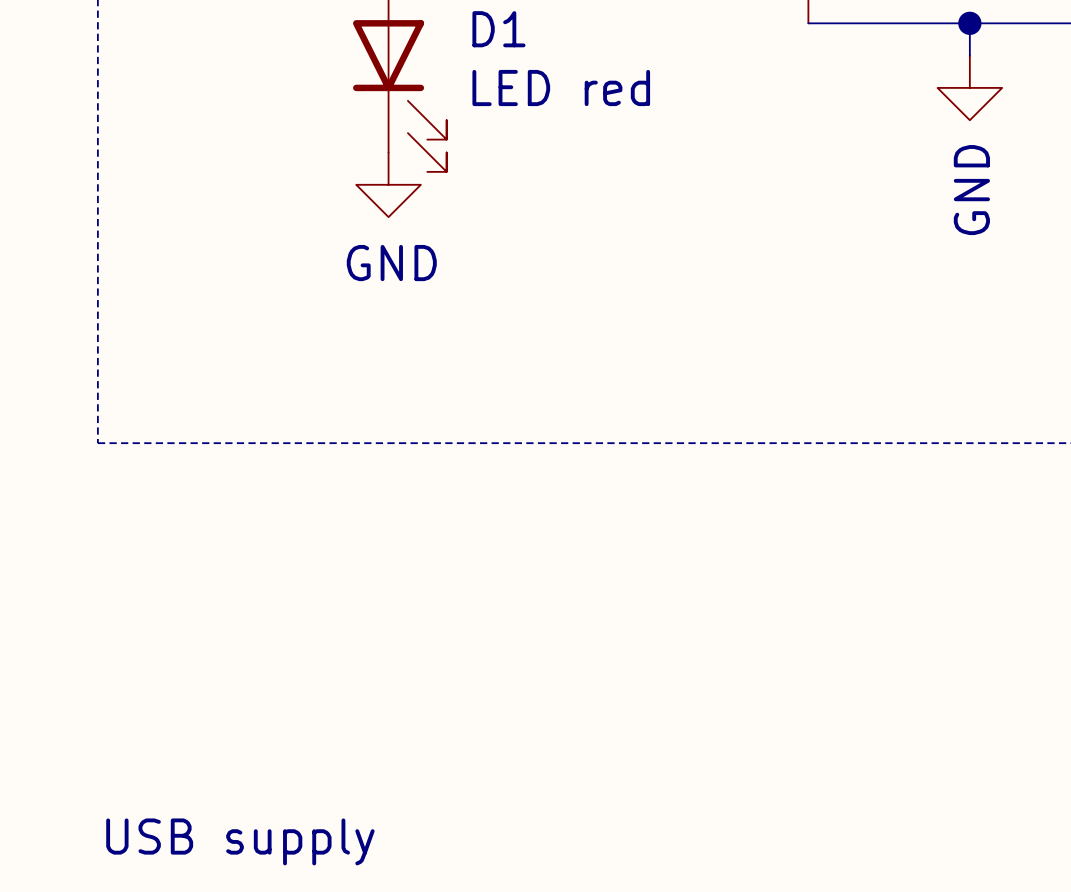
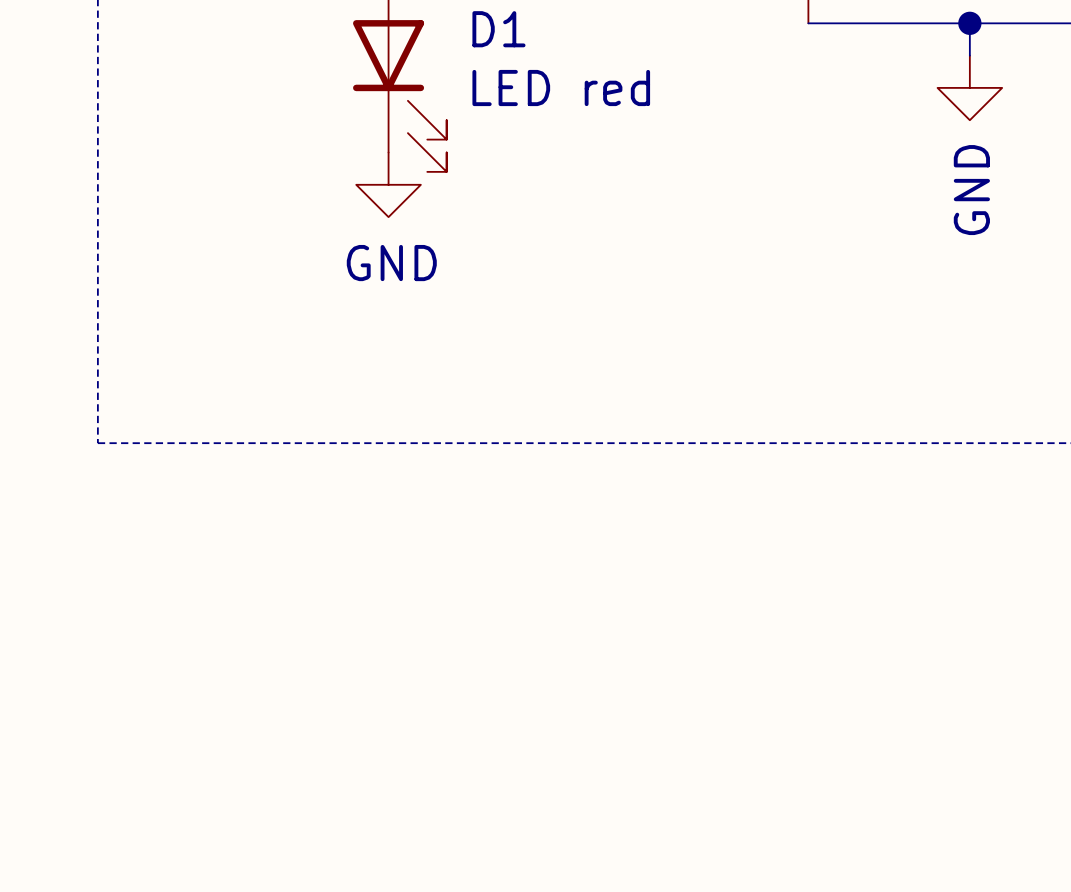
text: USB supply (240, 841) -> none

